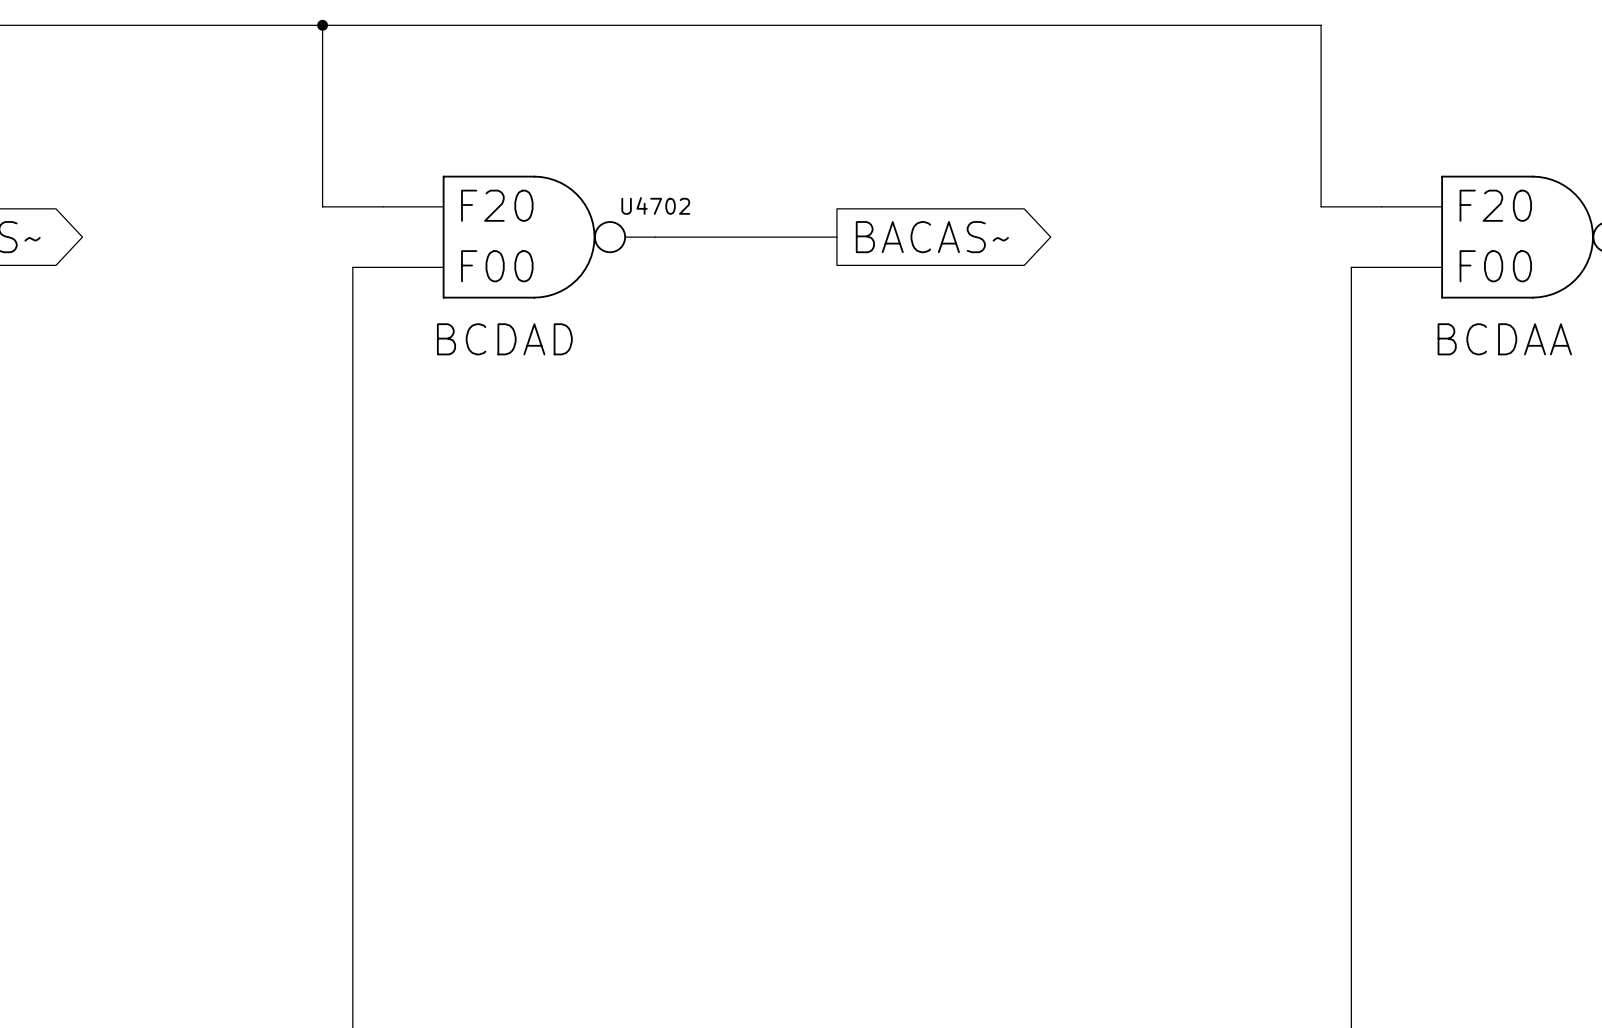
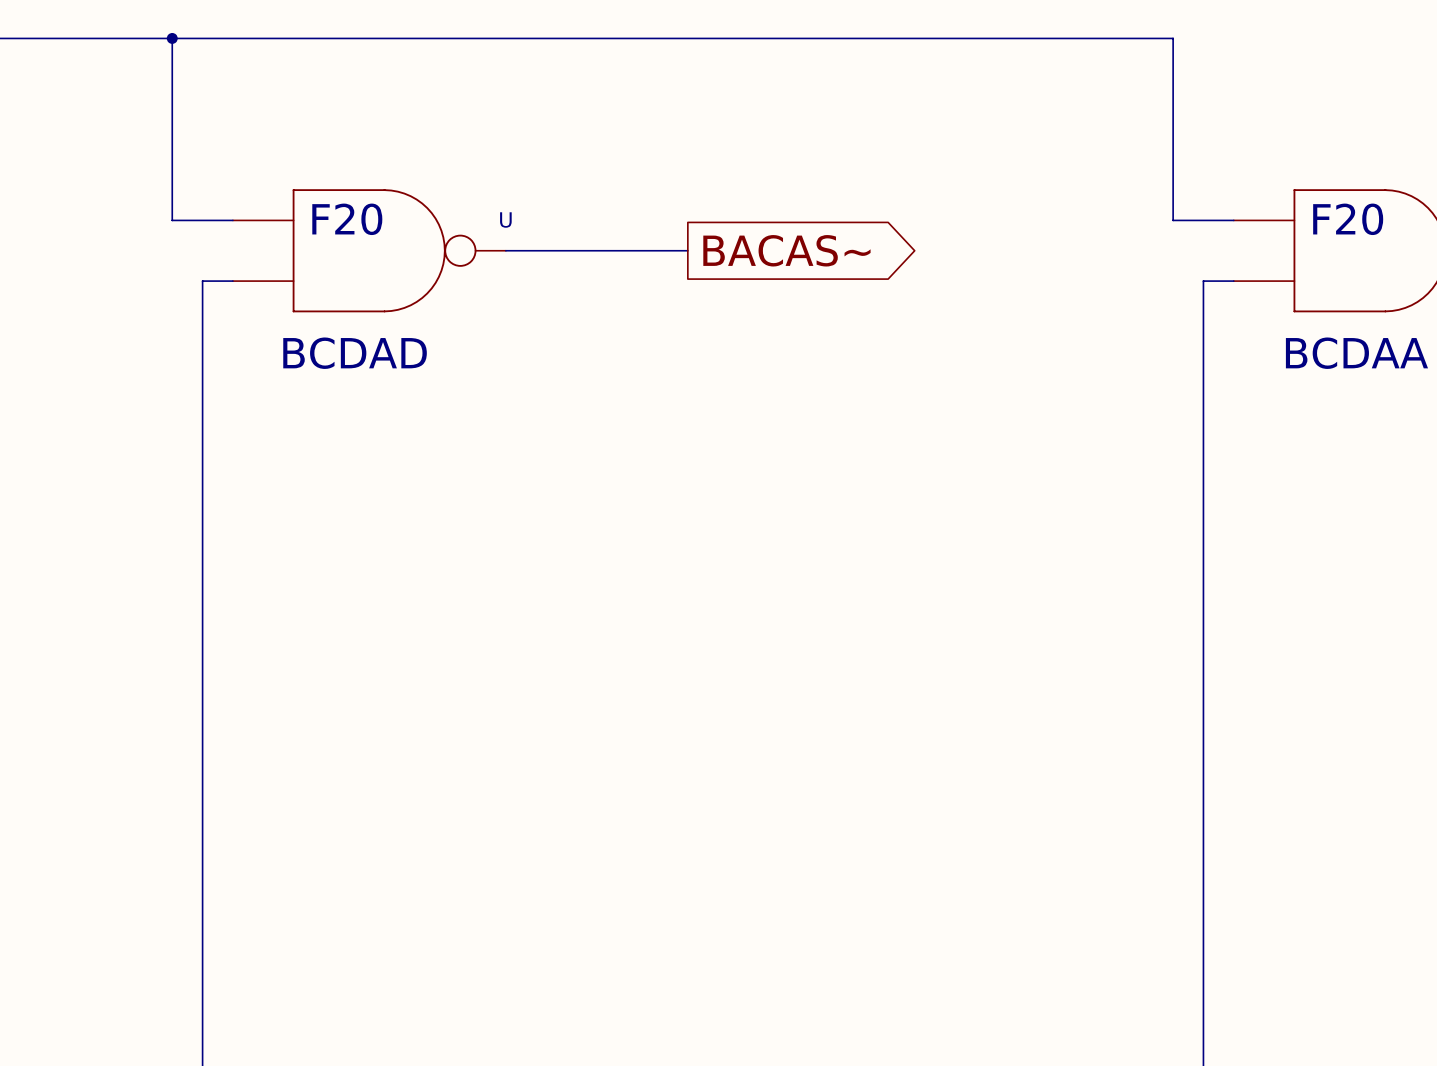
U4702 name: U4702 (655, 205) -> U (505, 220)
U4702 value: F00 (497, 266) -> none
part value: F00 (1495, 266) -> none

